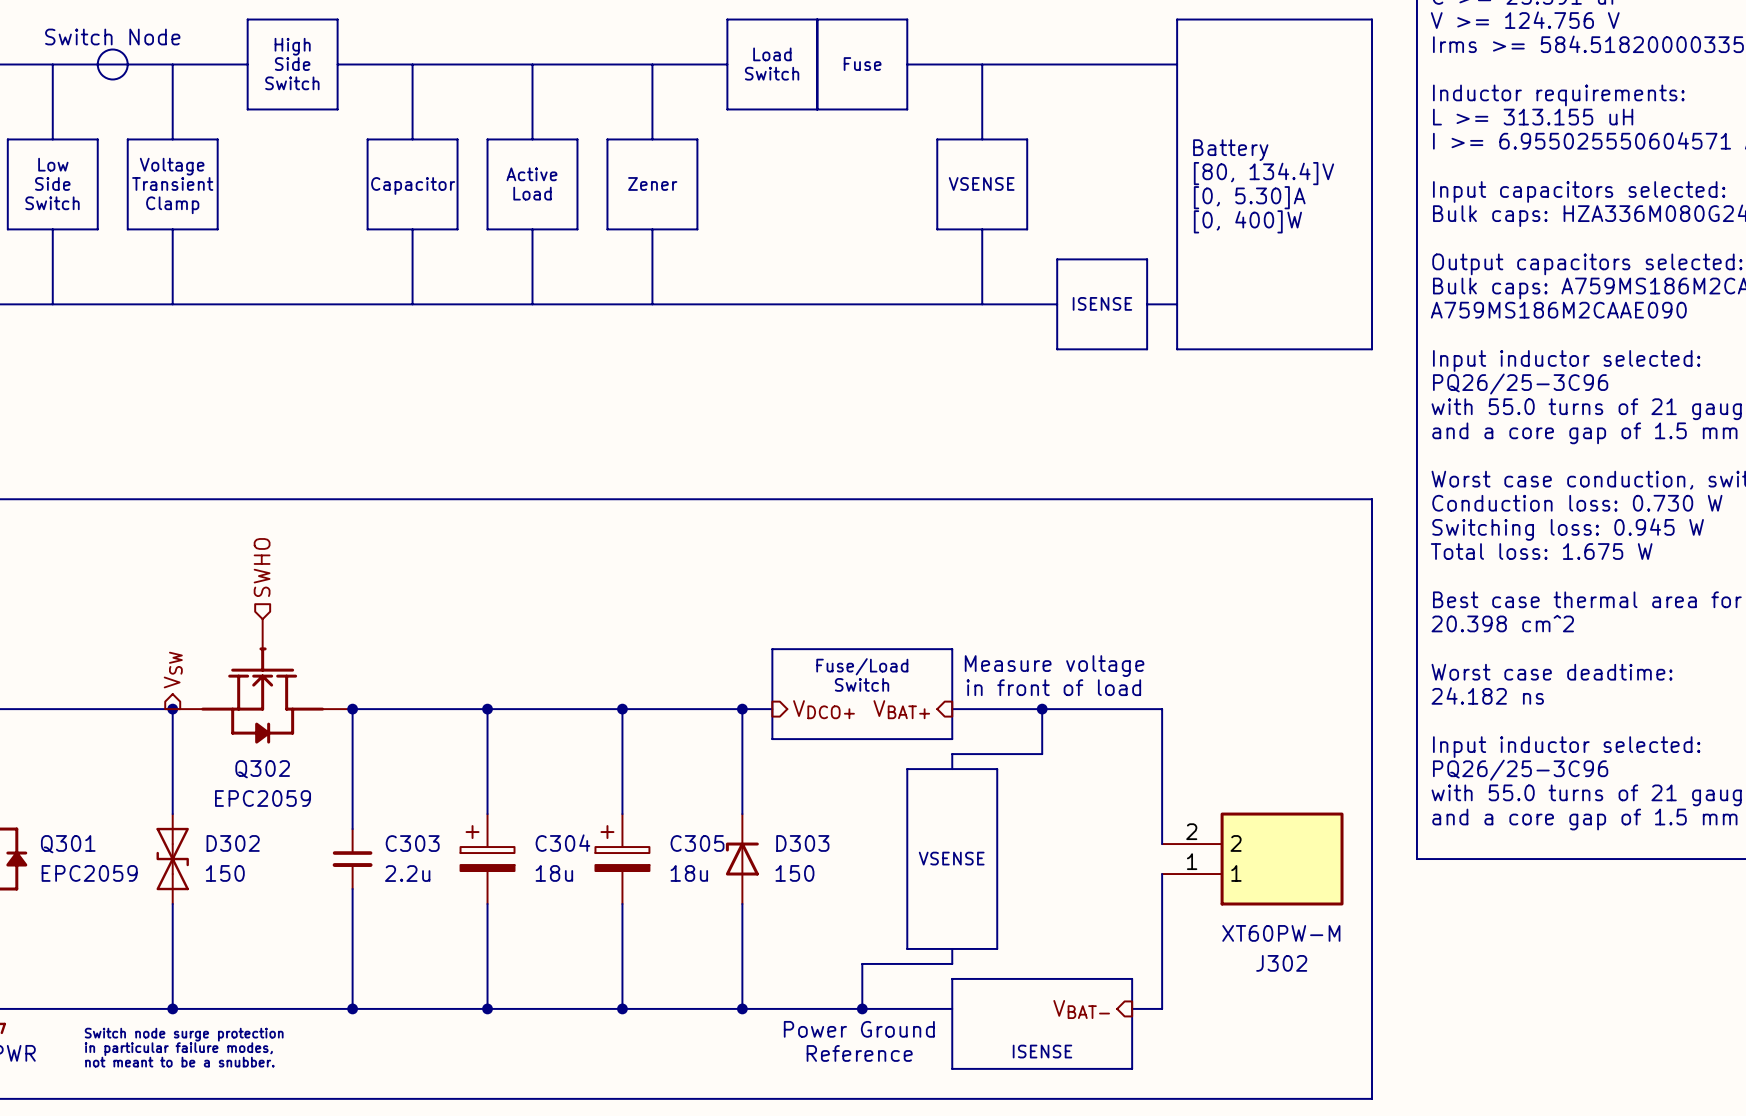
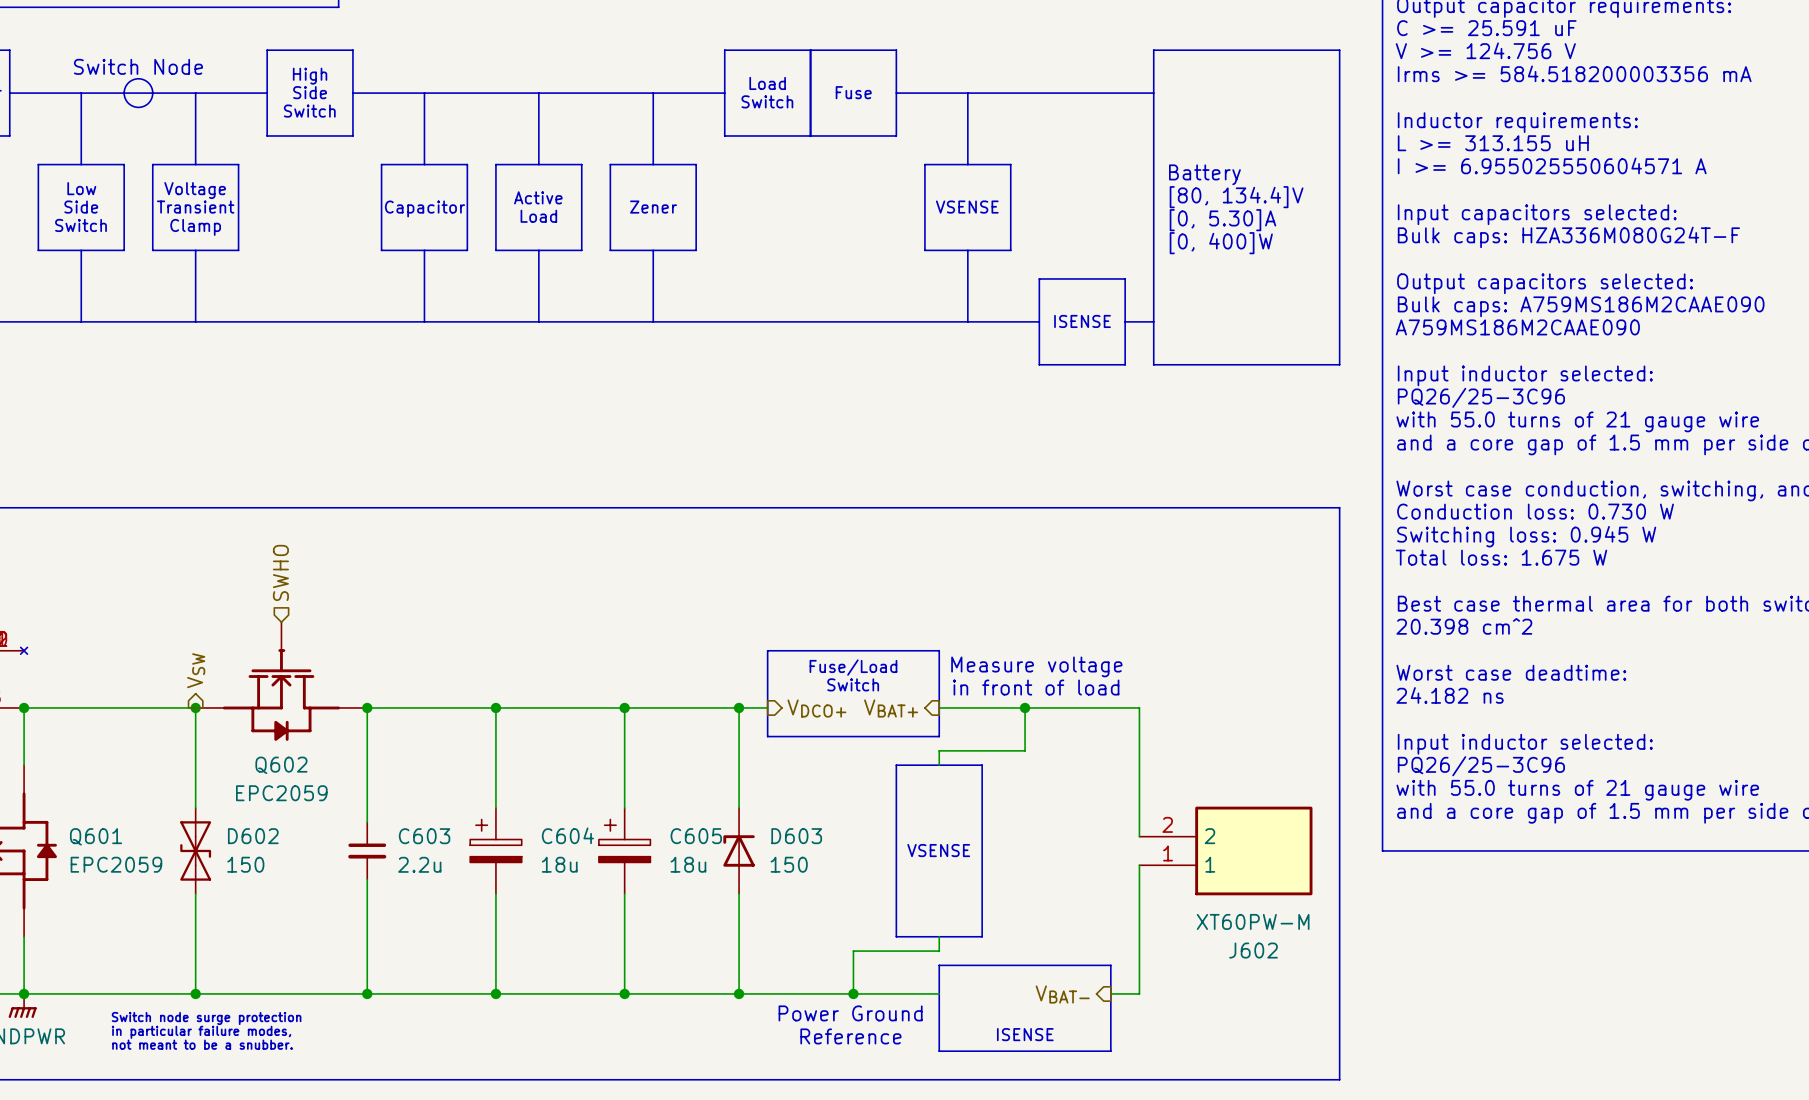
Q302 name: Q302 (262, 769) -> Q602 (281, 765)
D302 name: D302 (233, 843) -> D602 (253, 836)
C303 name: C303 (412, 843) -> C603 (424, 836)
C304 name: C304 (562, 843) -> C604 (567, 835)
C305 name: C305 (697, 843) -> C605 (696, 836)
D303 name: D303 (802, 843) -> D603 (796, 836)
Q301 name: Q301 (68, 844) -> Q601 (96, 836)
J302 name: J302 (1281, 963) -> J602 (1253, 950)

